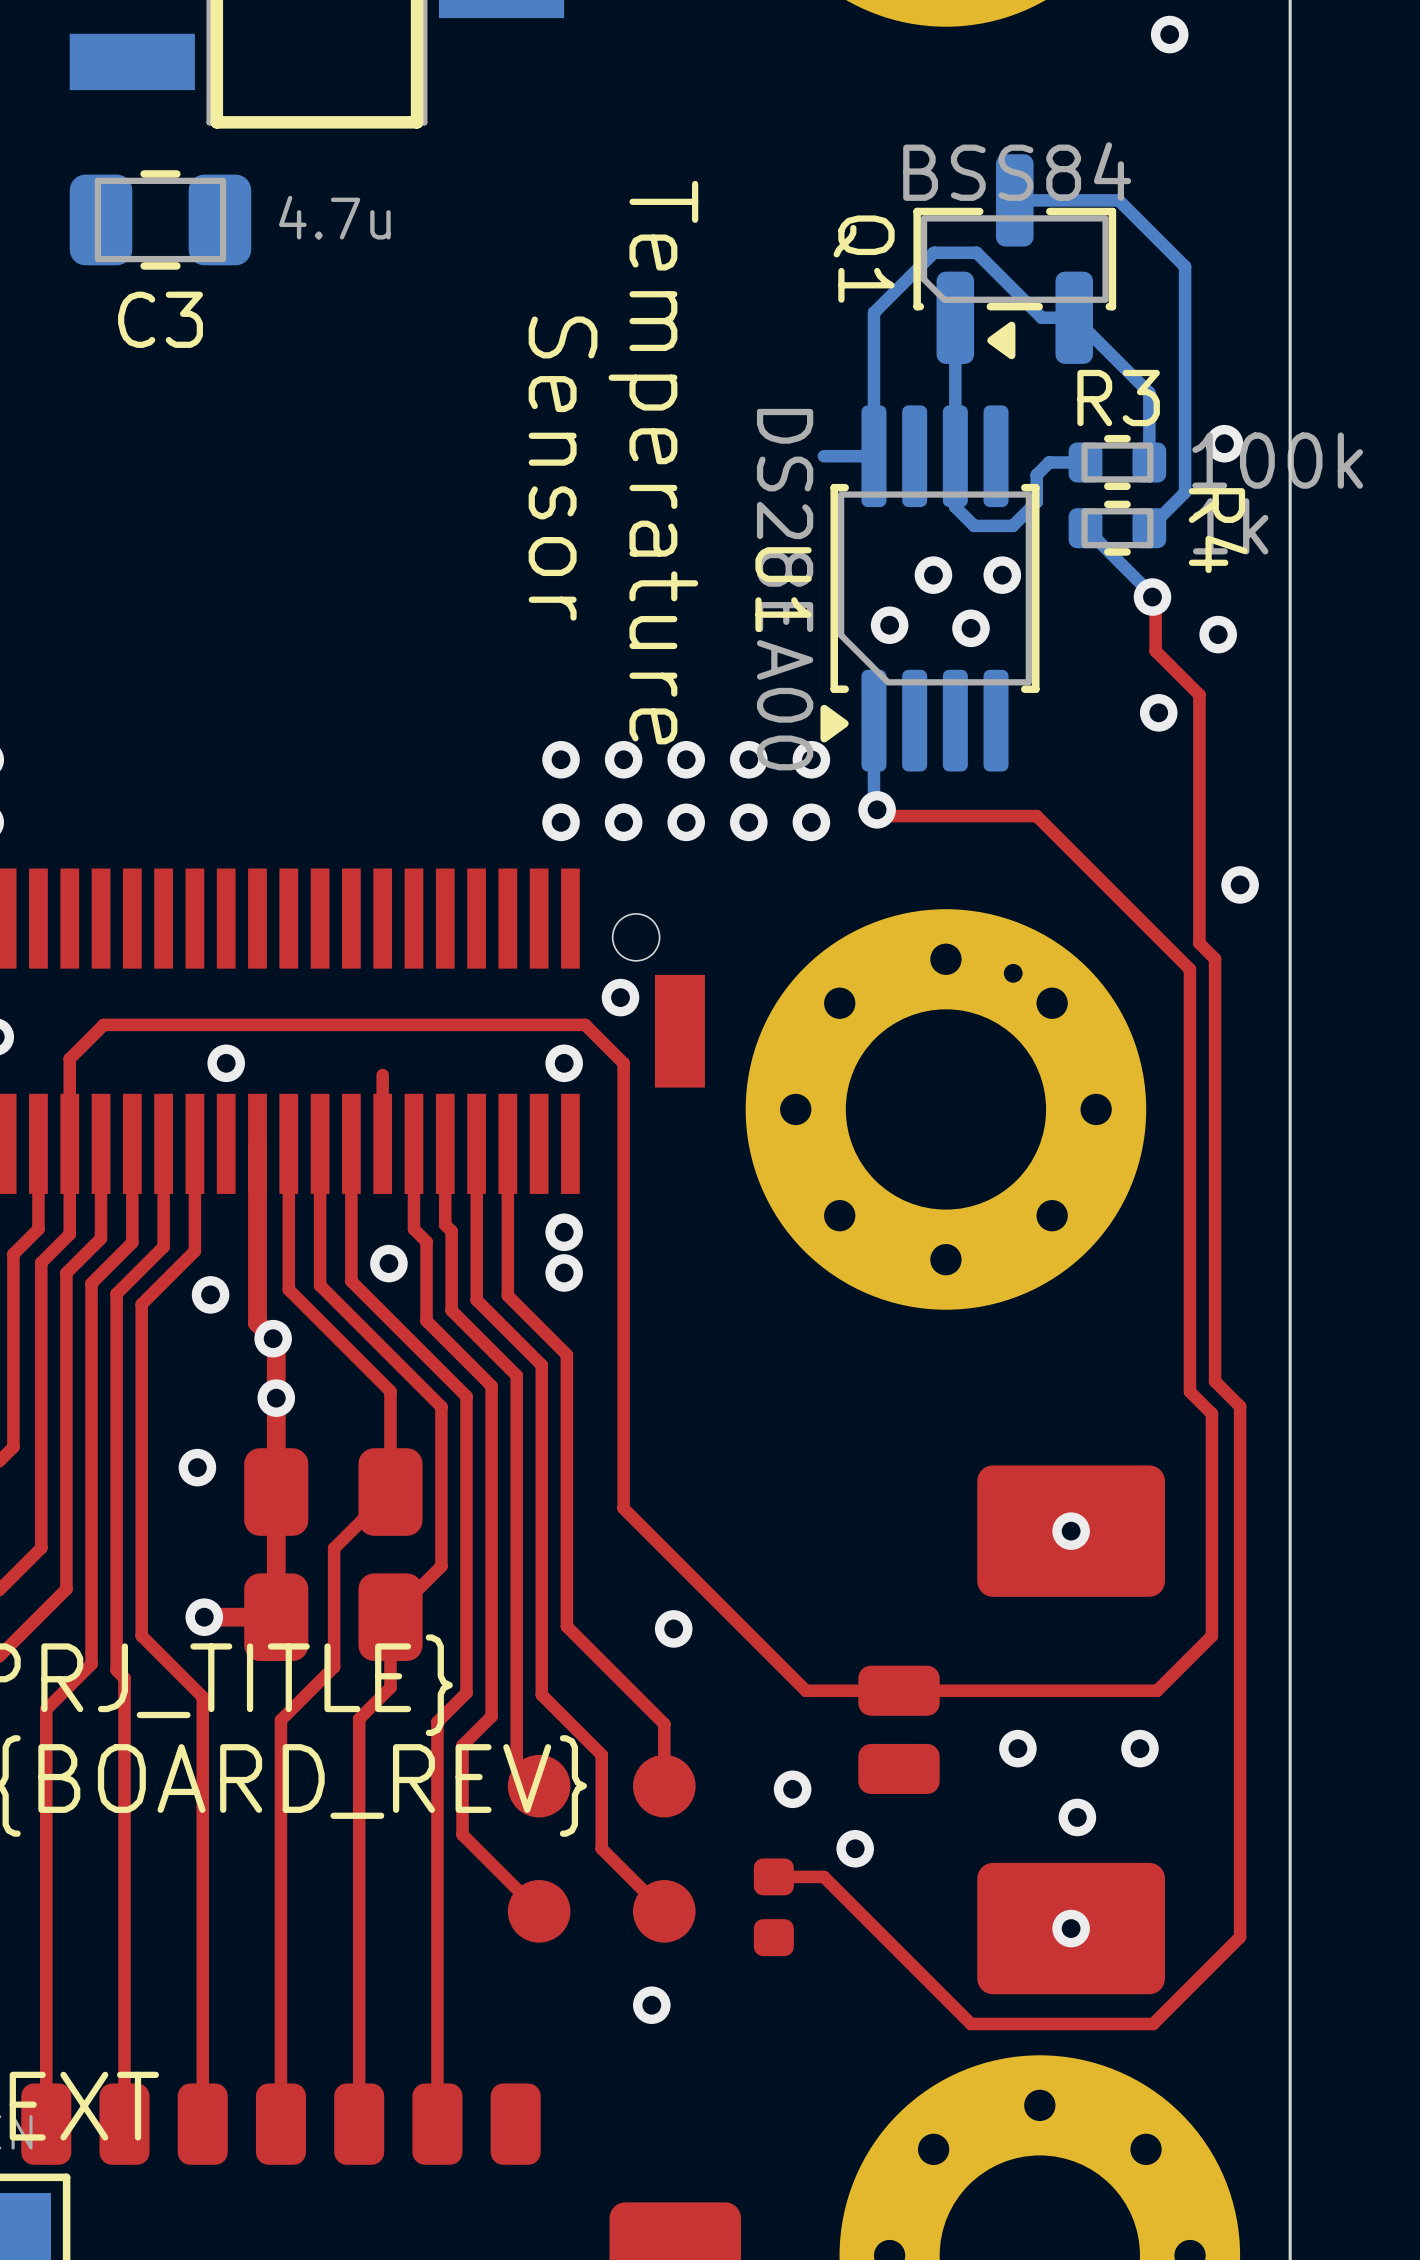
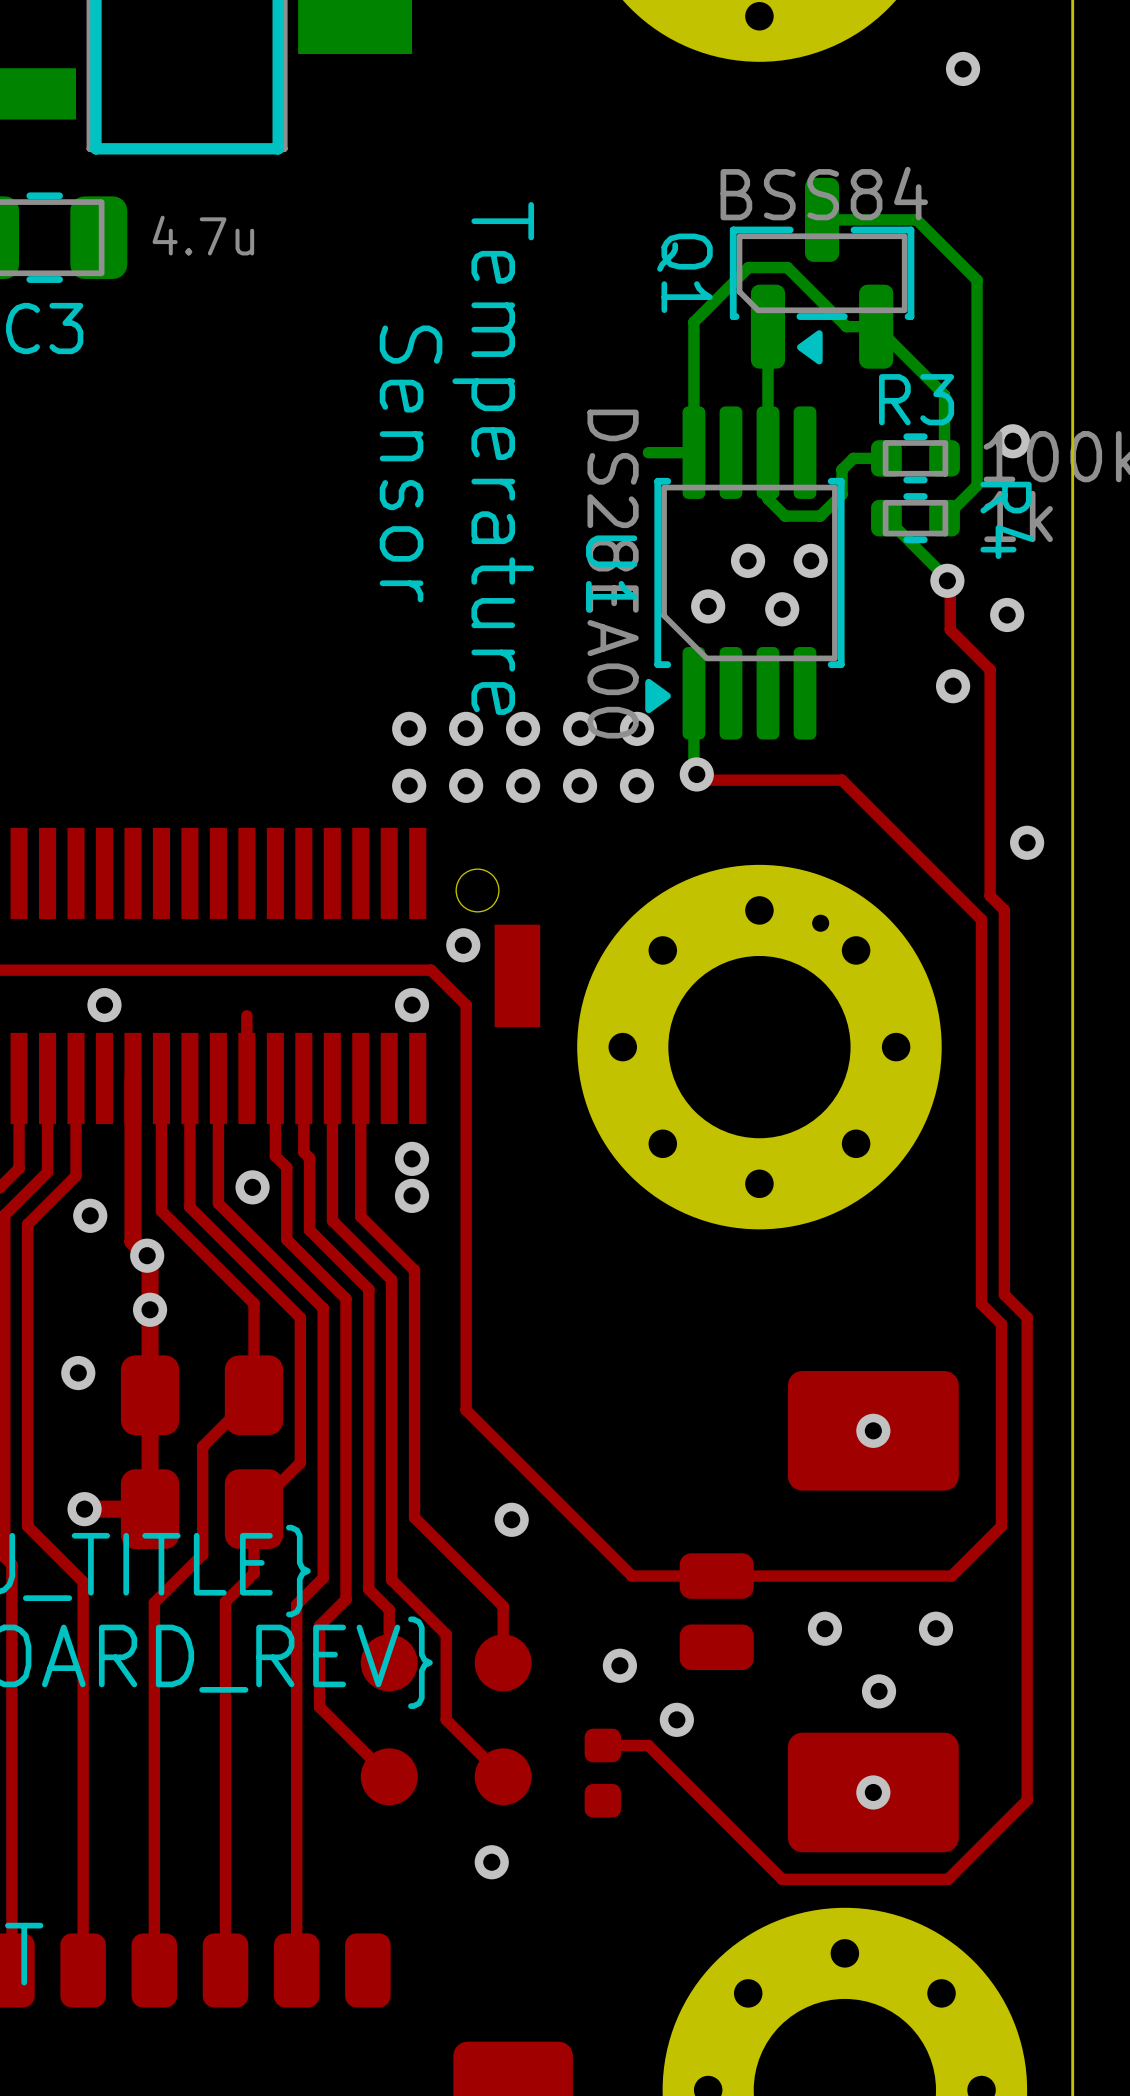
top track: (516, 1705) (516, 1763) (539, 1786) -> (368, 1589) (389, 1609) (389, 1662)

